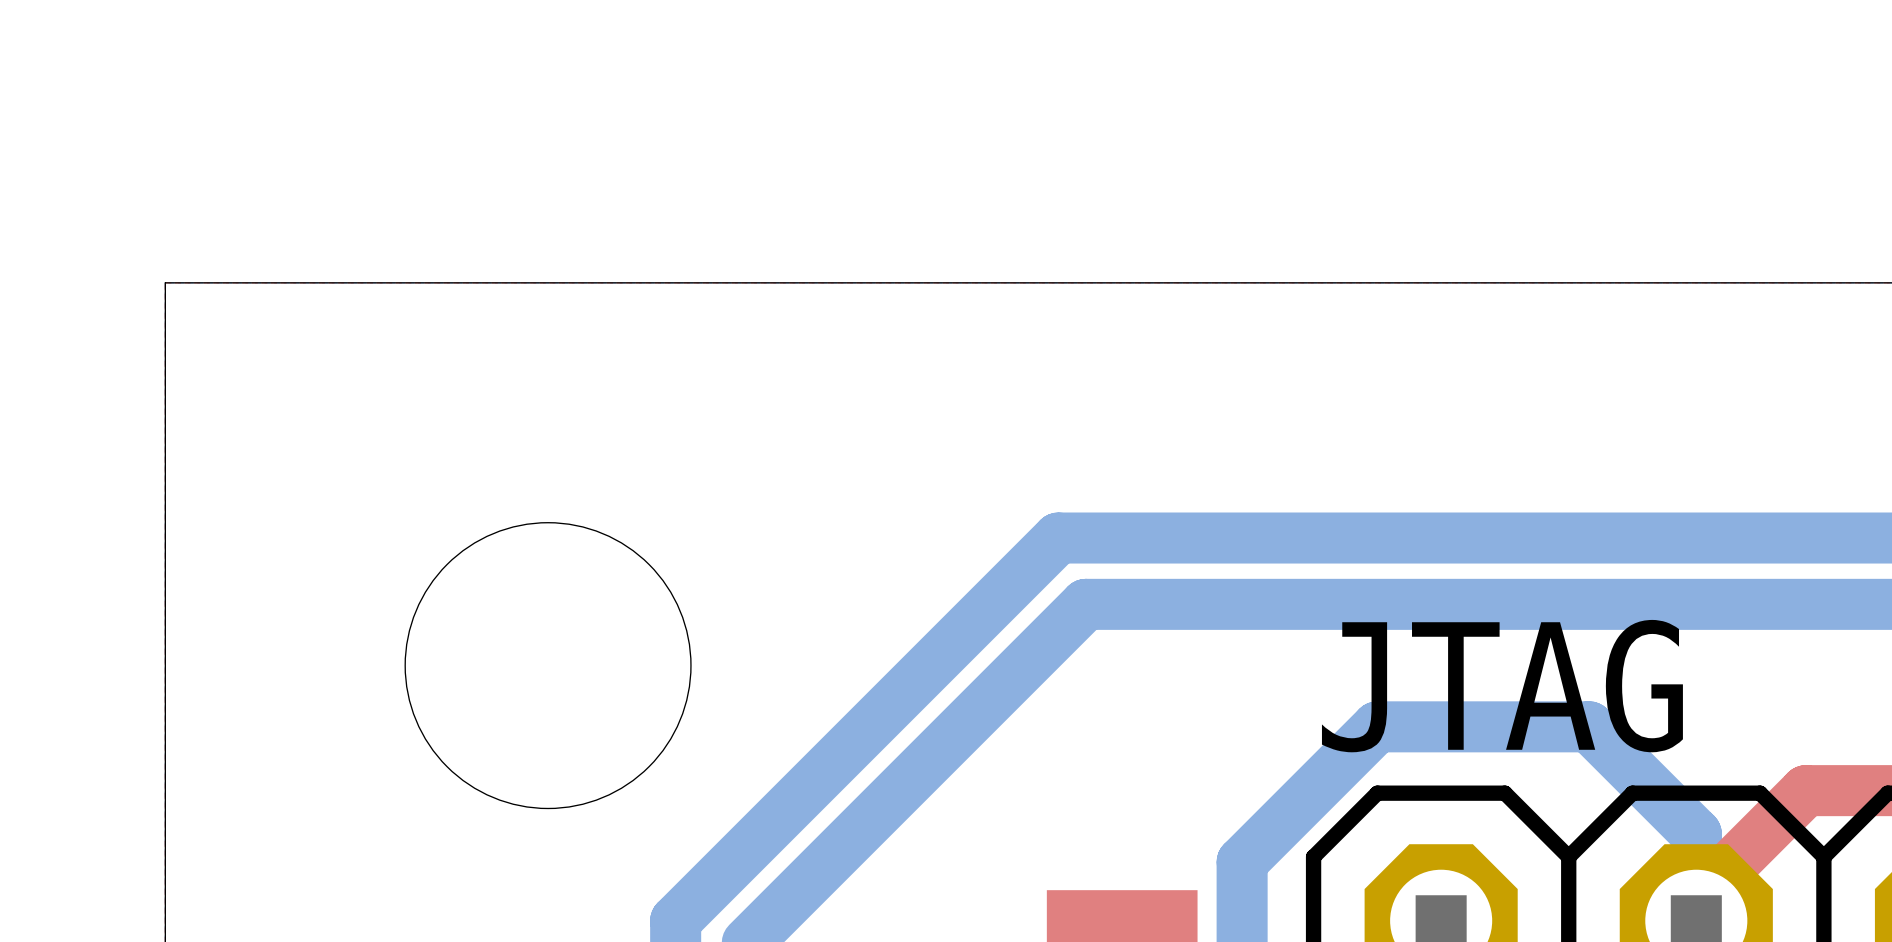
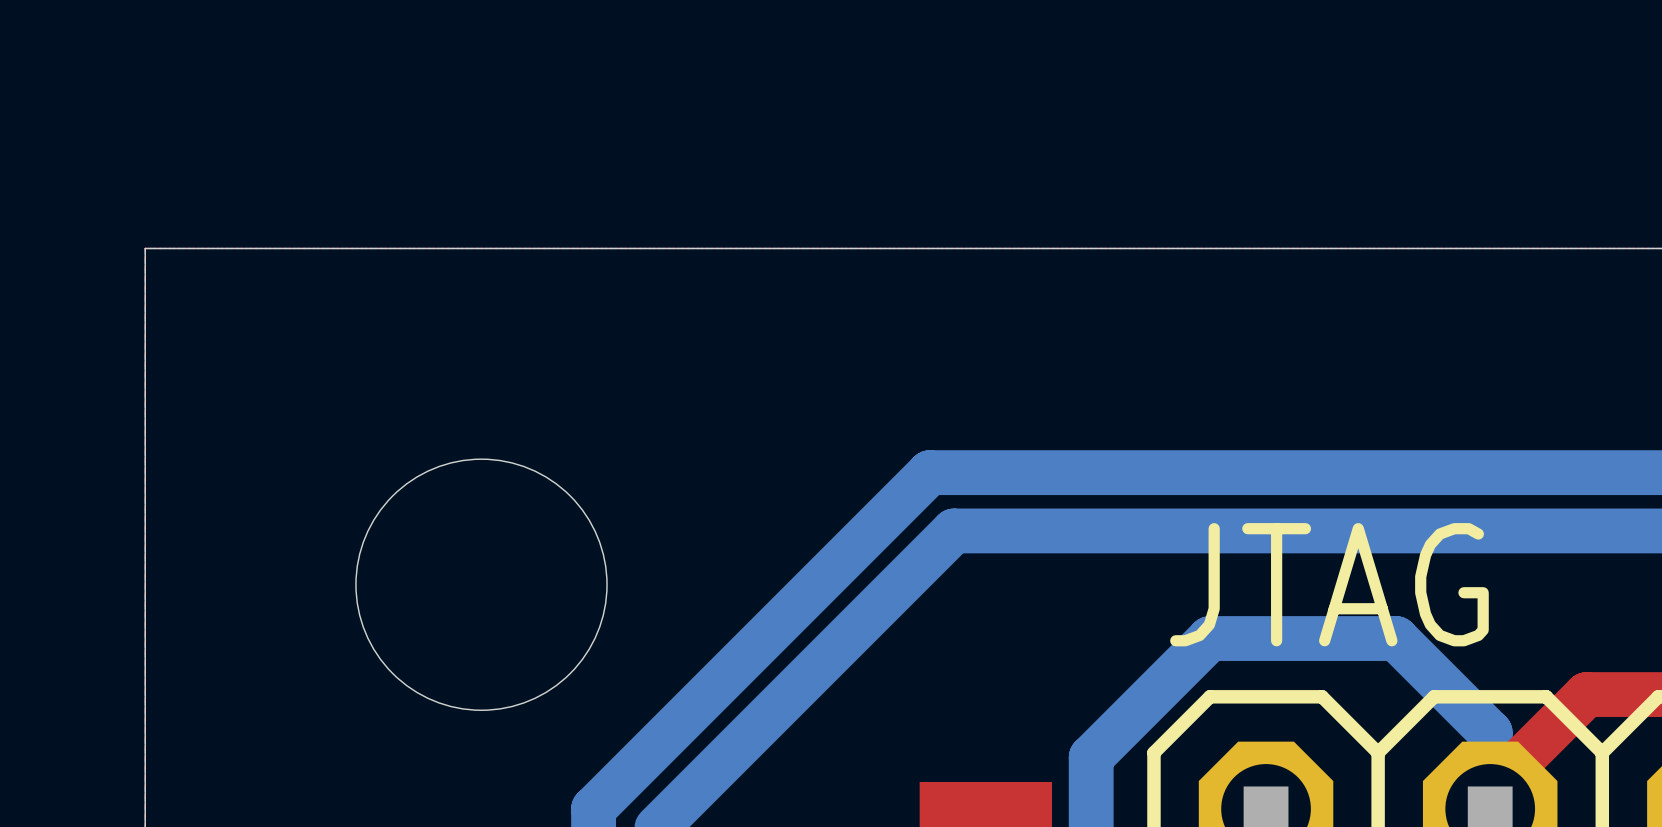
JTAG name position: JTAG (1502, 686) -> JTAG (1329, 584)

